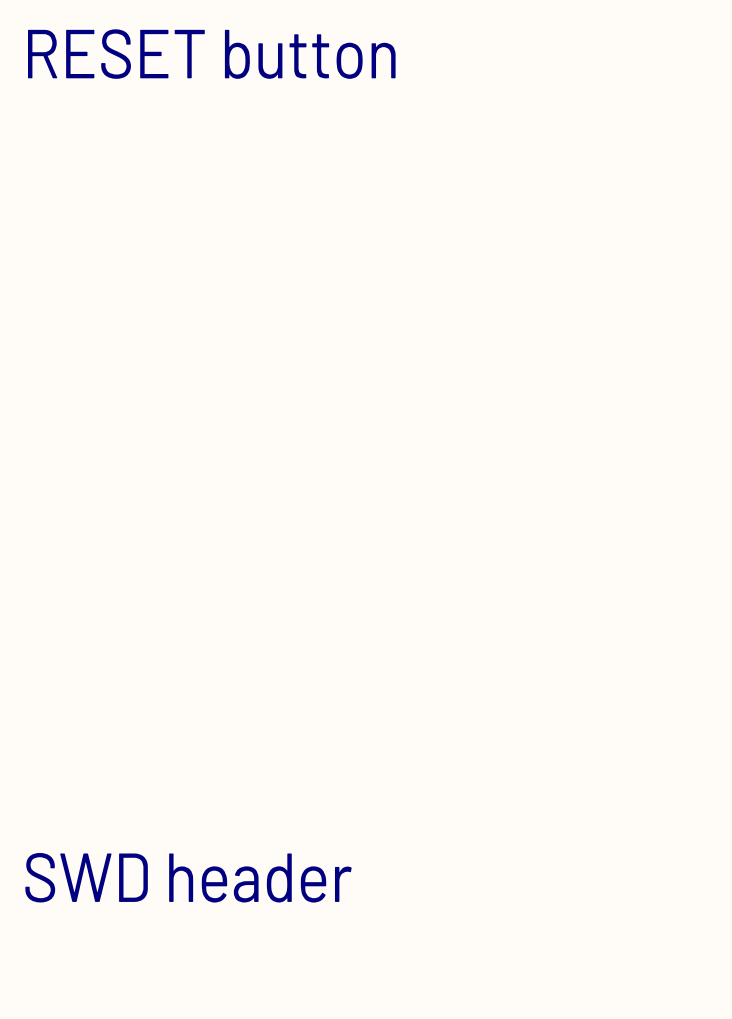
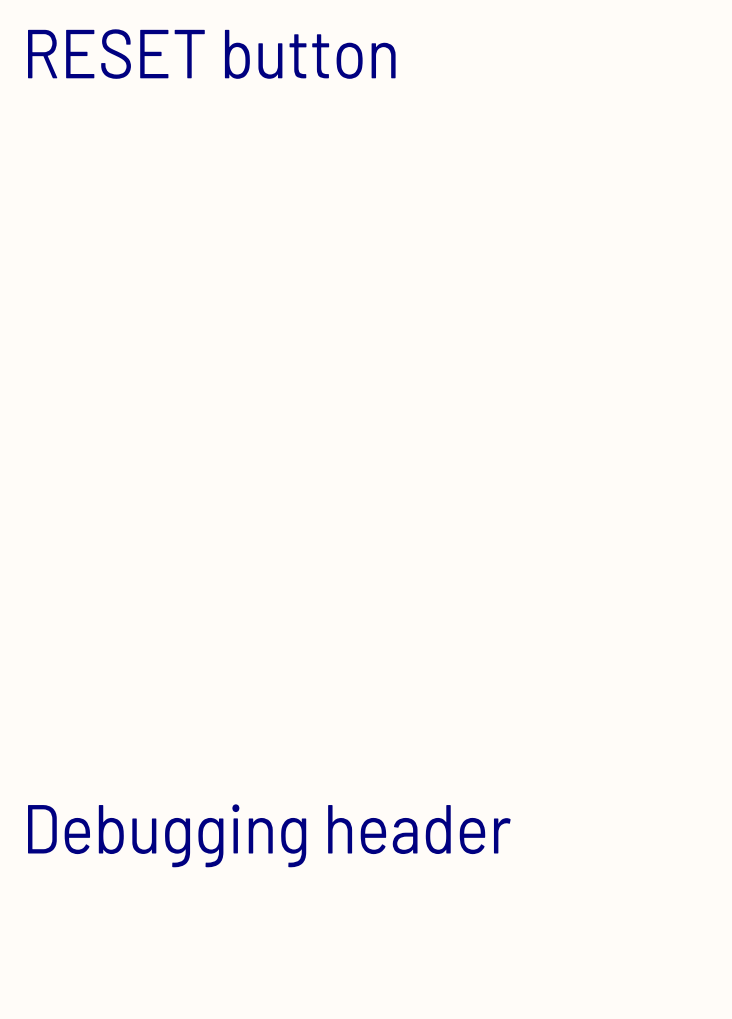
text: SWD header (188, 877) -> Debugging header (269, 835)

